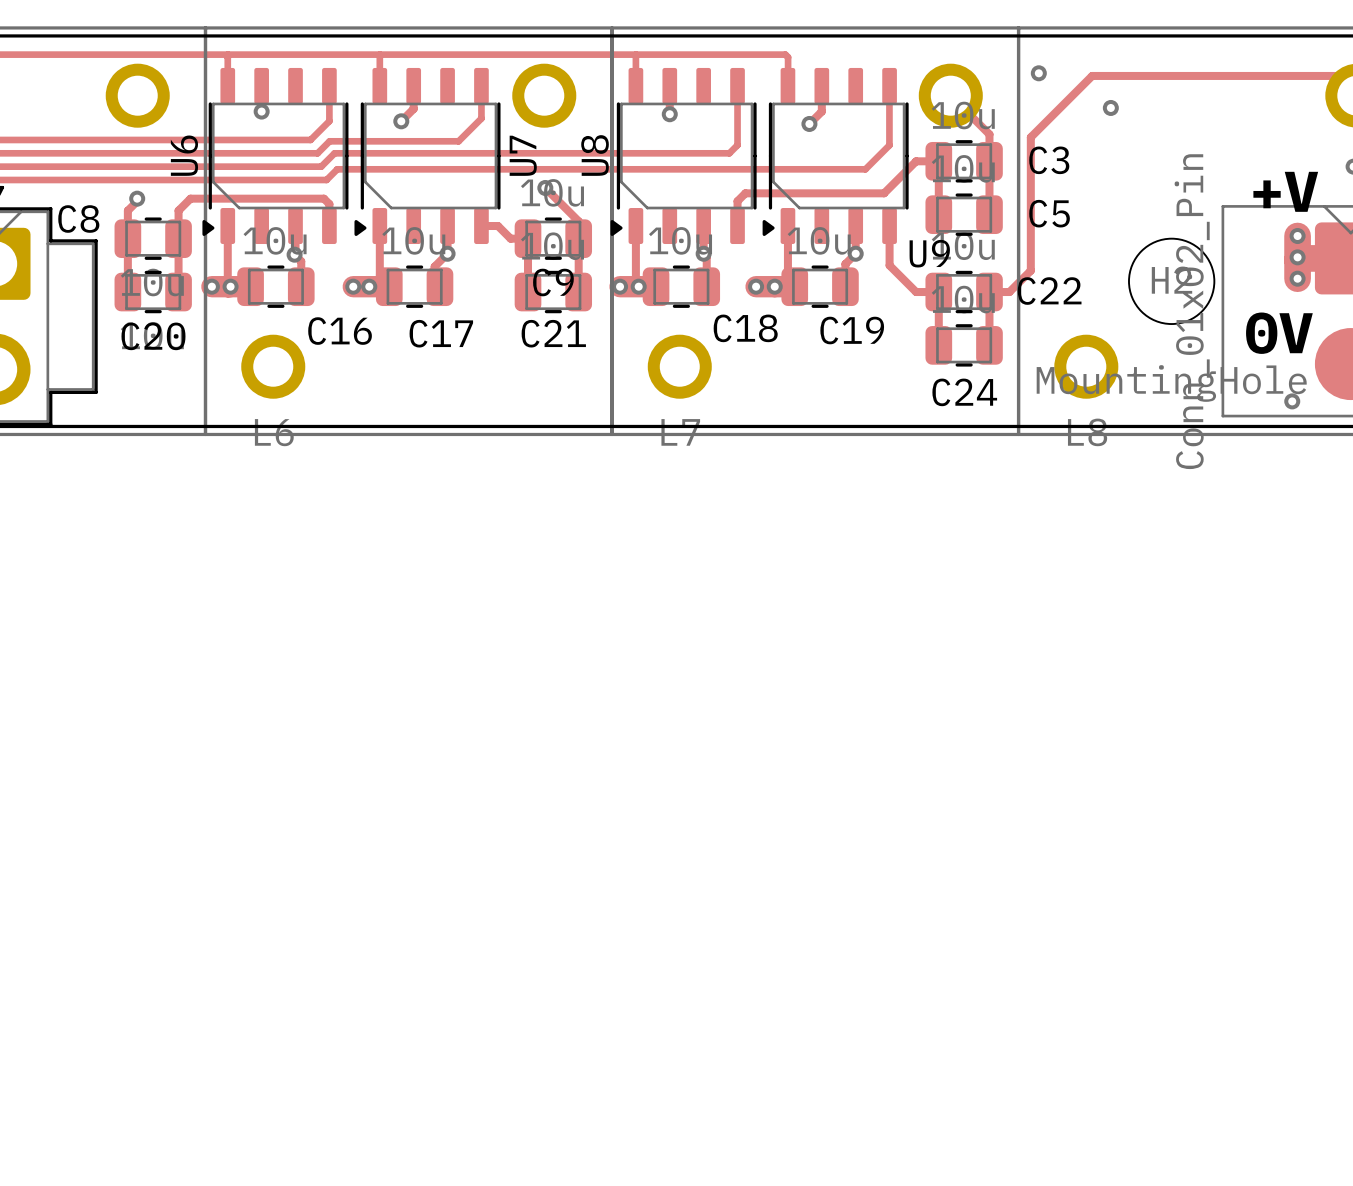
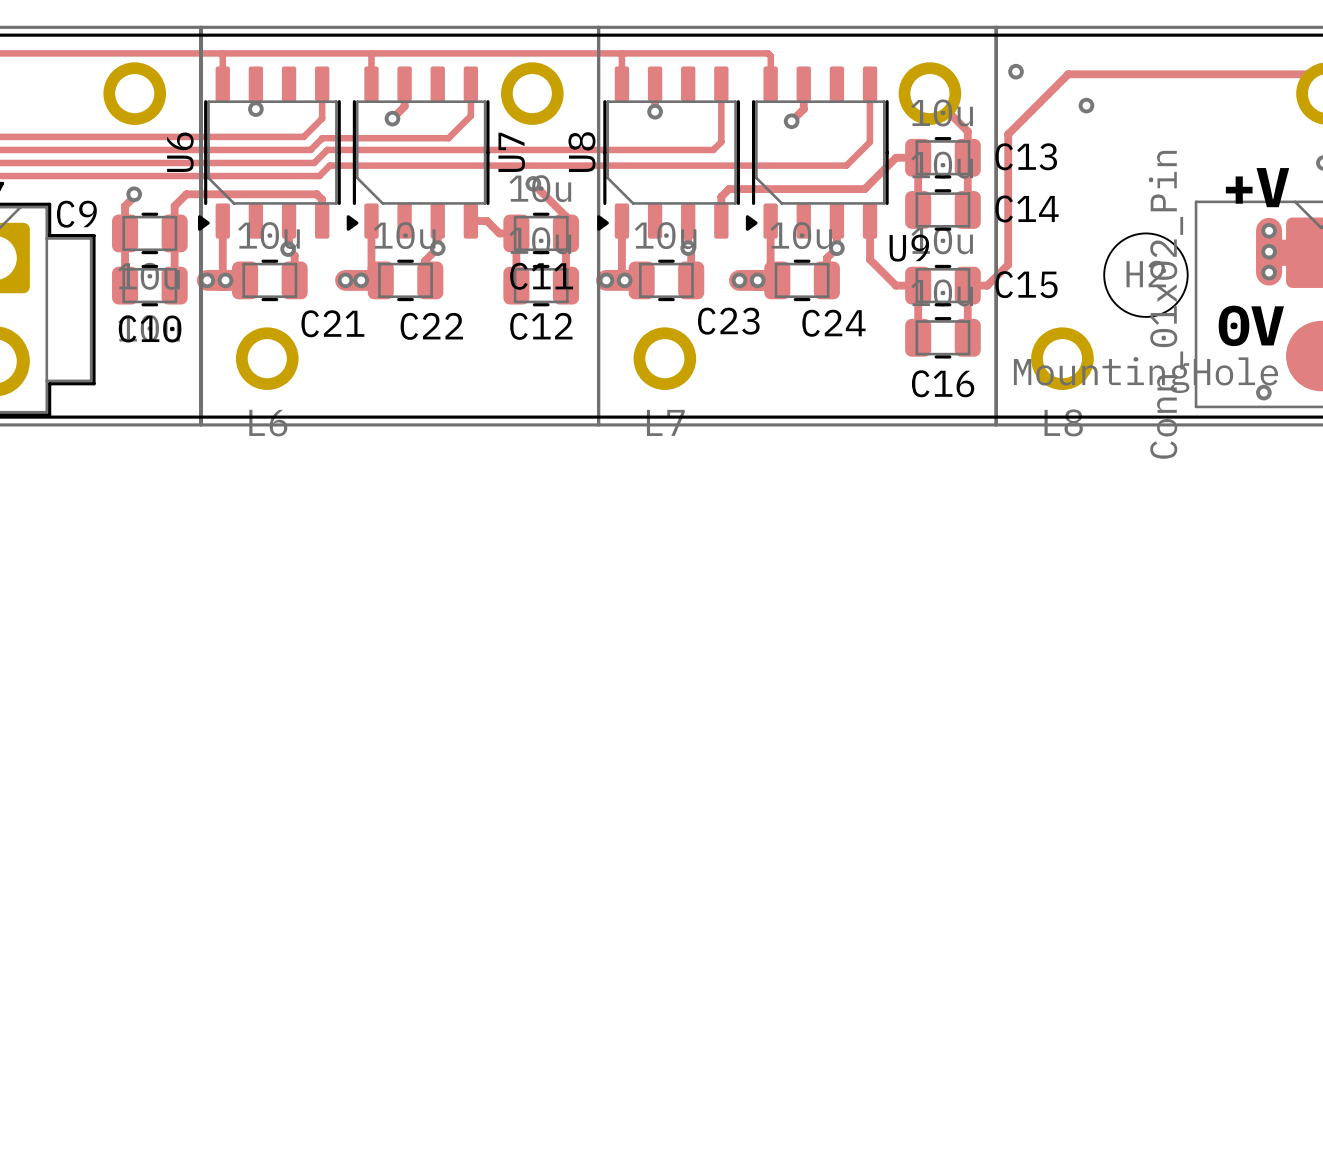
C3 name: C3 (1049, 160) -> C13 (1026, 156)
C5 name: C5 (1049, 213) -> C14 (1027, 208)
C8 name: C8 (78, 219) -> C9 (76, 214)
C9 name: C9 (553, 282) -> C11 (541, 276)
C22 name: C22 (1049, 291) -> C15 (1026, 284)
C18 name: C18 (745, 328) -> C23 (728, 321)
C19 name: C19 (852, 330) -> C24 (833, 323)
C16 name: C16 (340, 331) -> C21 (332, 323)
C17 name: C17 (441, 333) -> C22 (431, 326)
C21 name: C21 (553, 333) -> C12 (541, 326)
C20 name: C20 (153, 336) -> C10 (150, 328)
C24 name: C24 (964, 392) -> C16 (943, 383)

